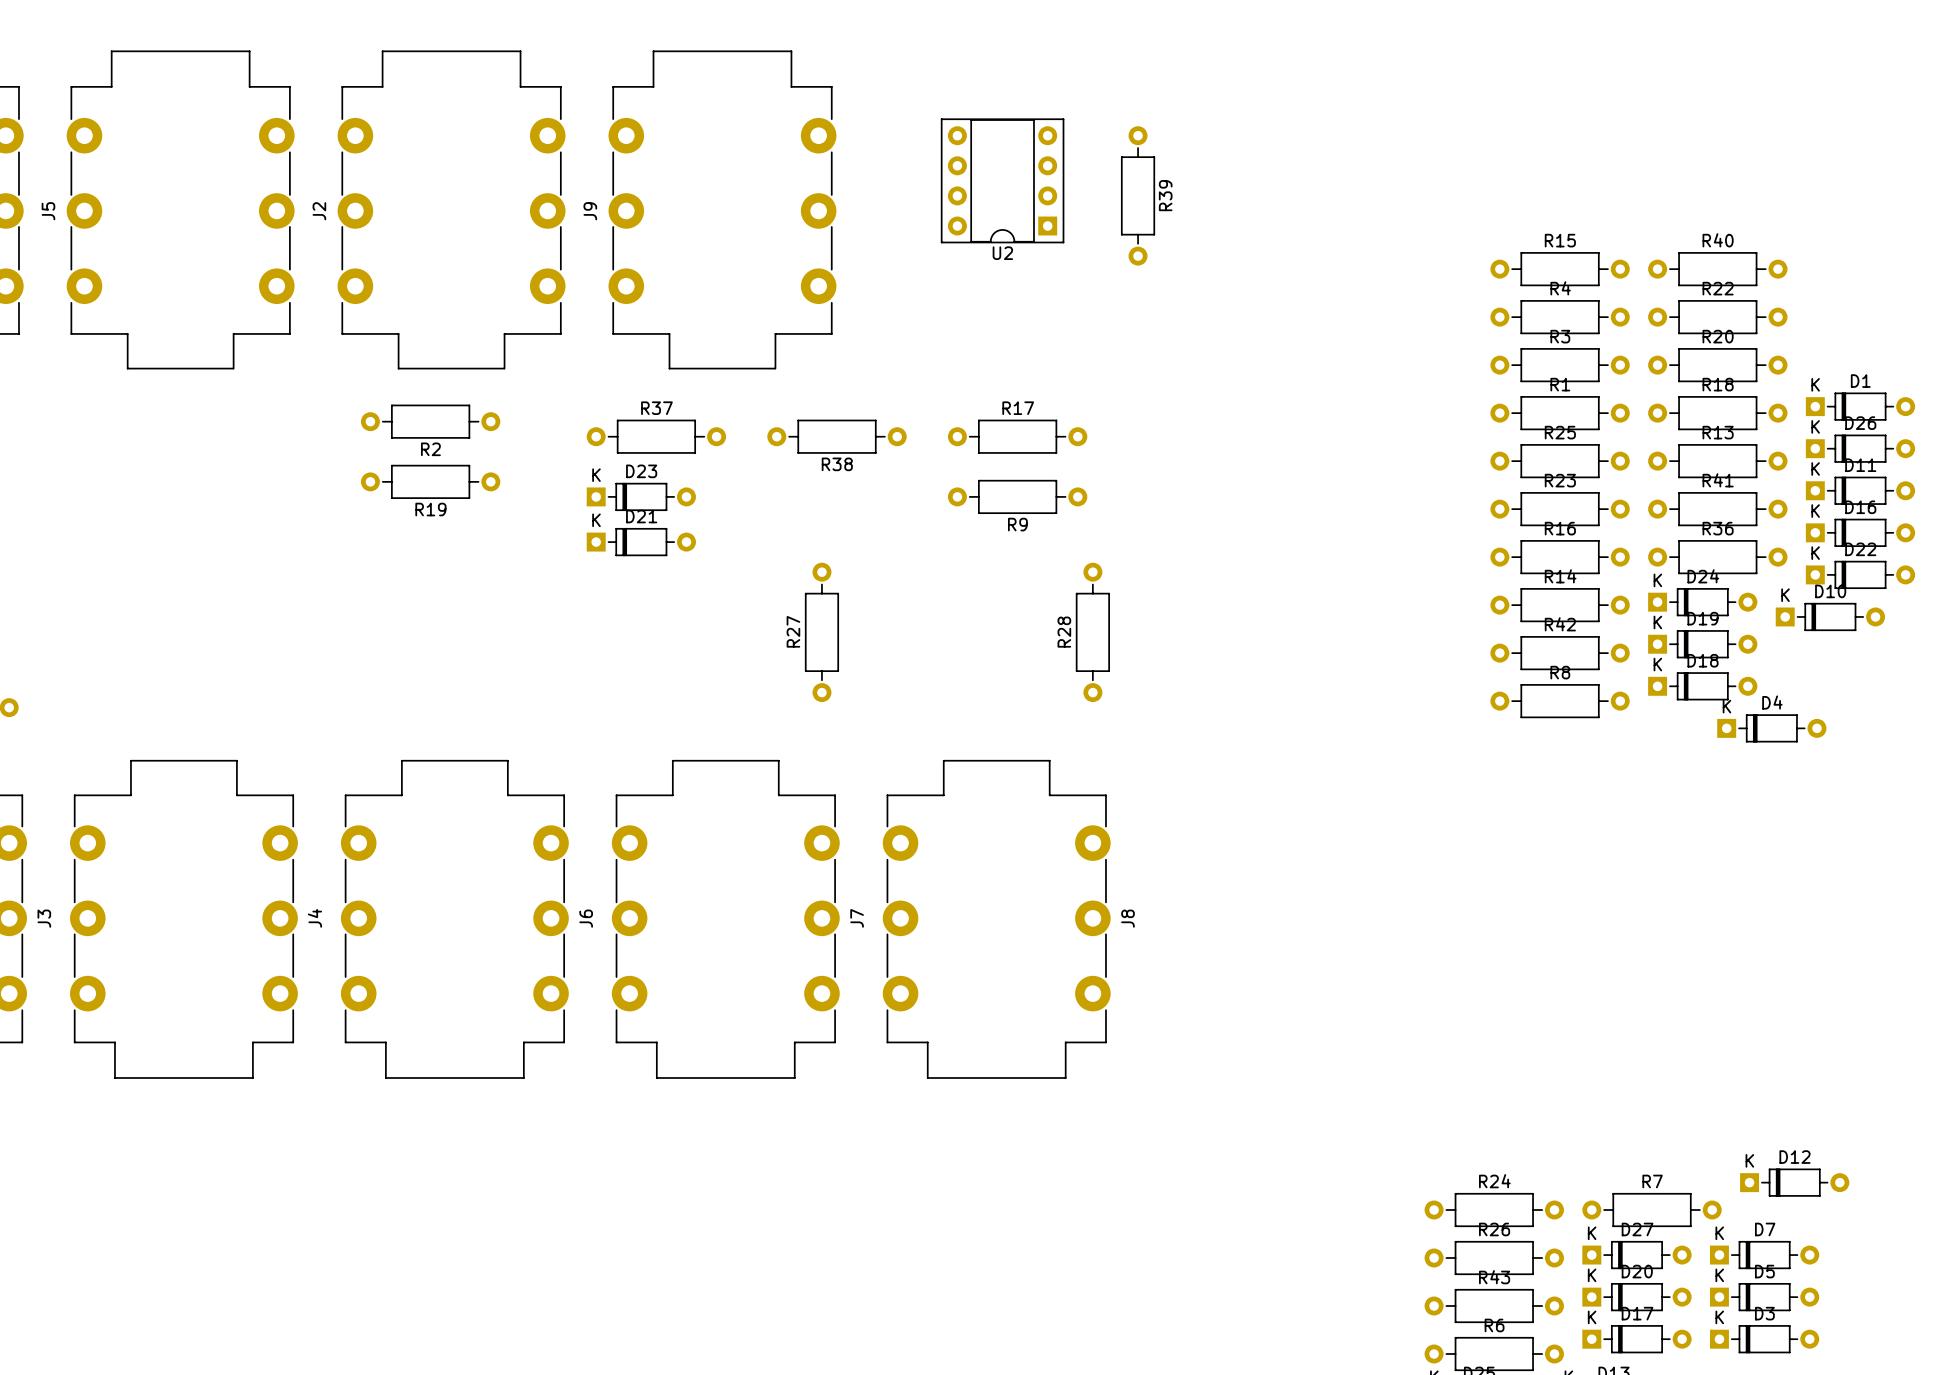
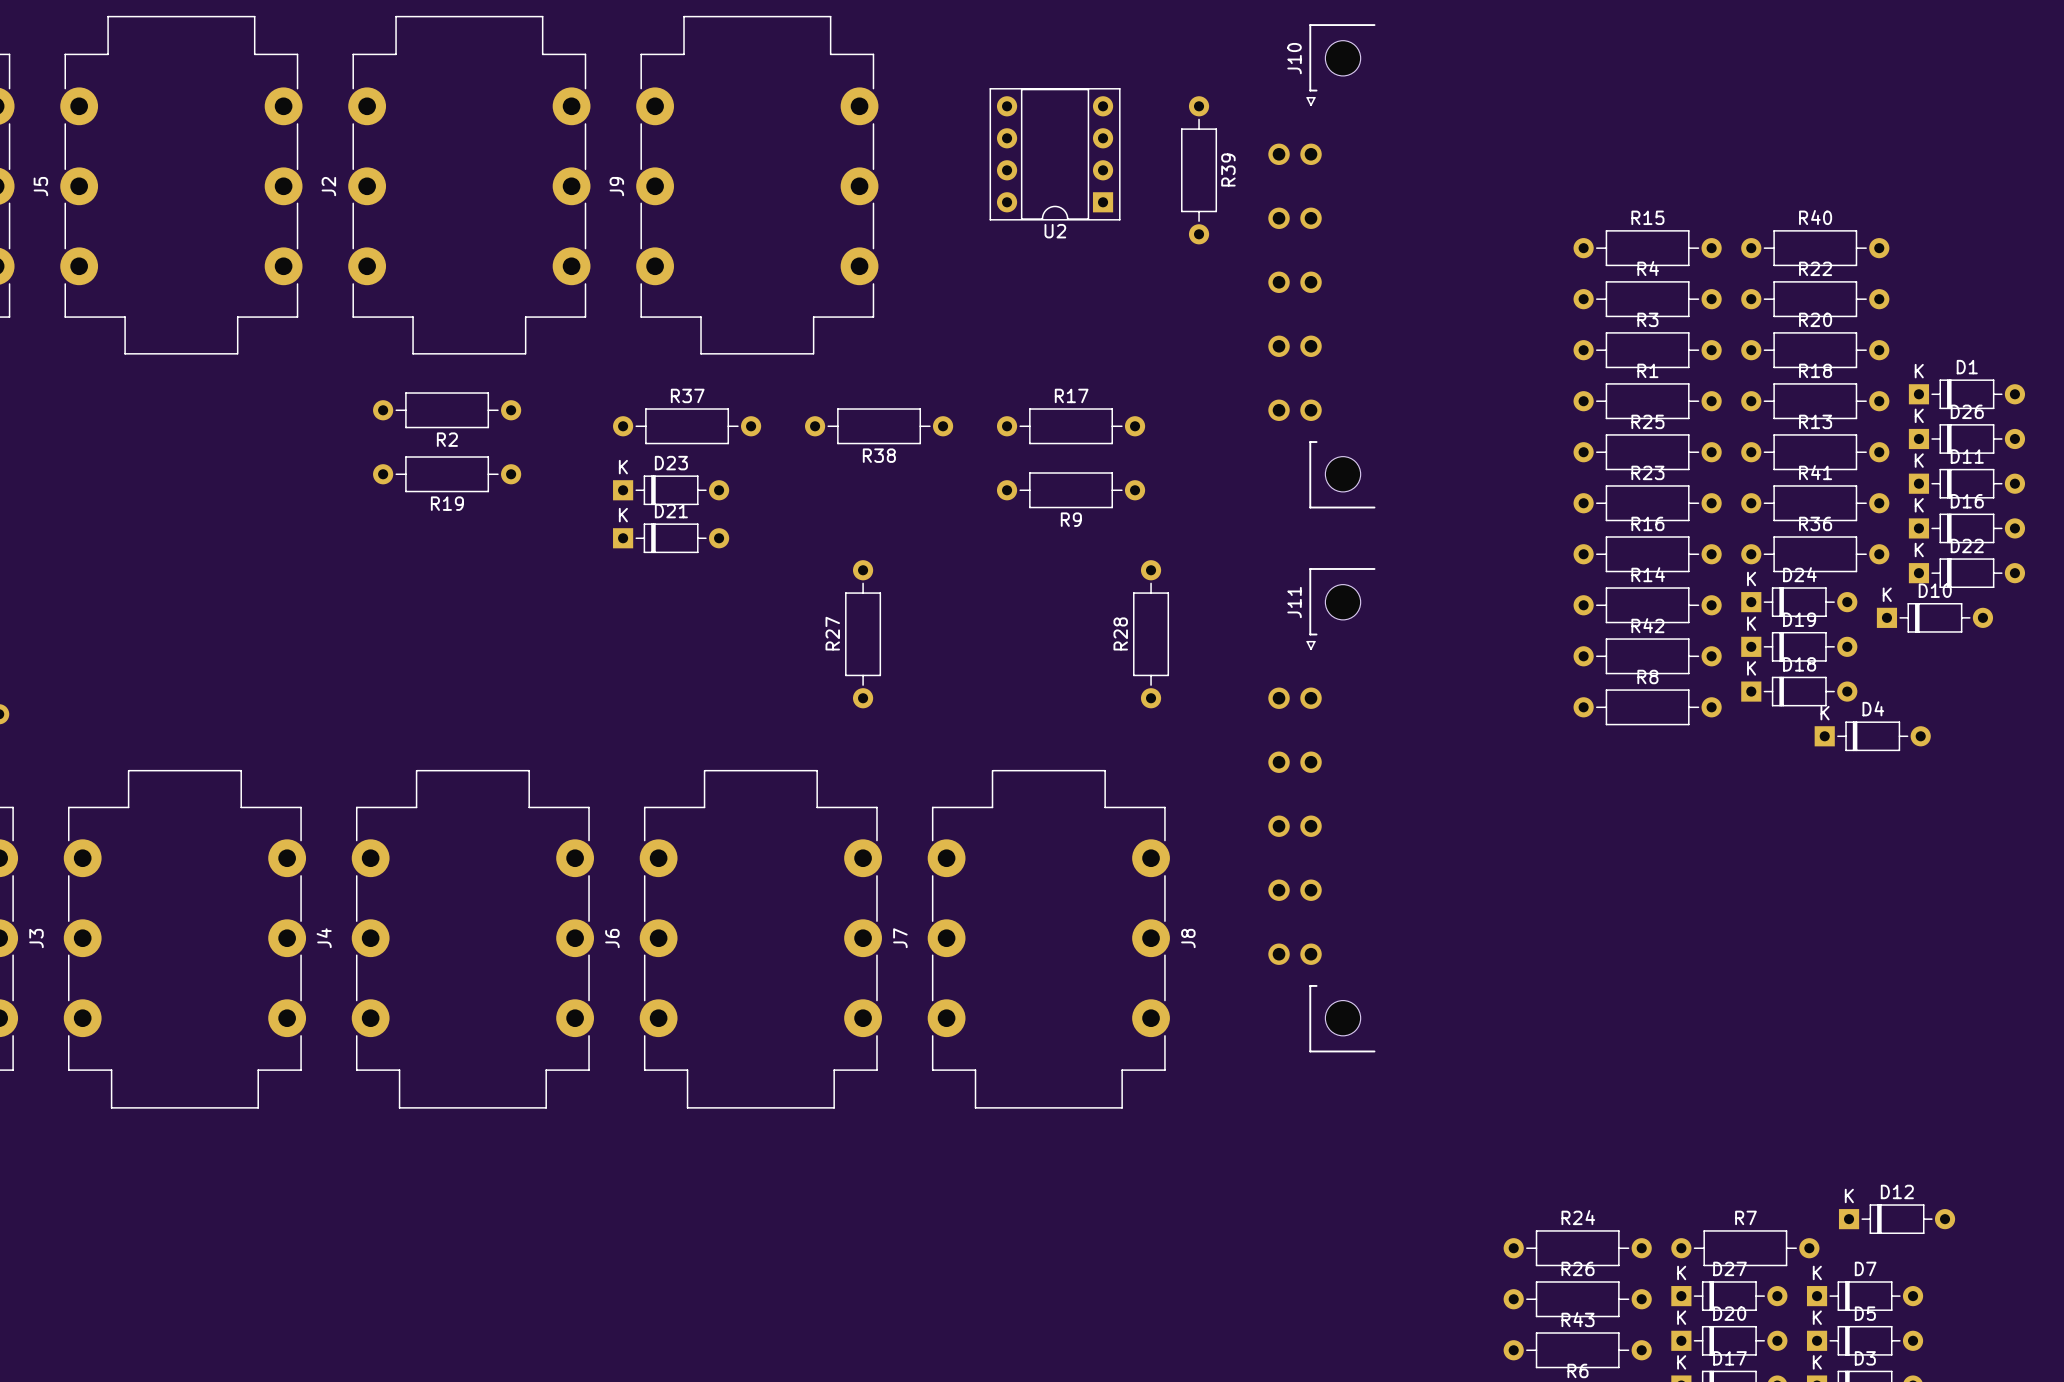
J10: none -> (1321, 266)
J11: none -> (1321, 810)

